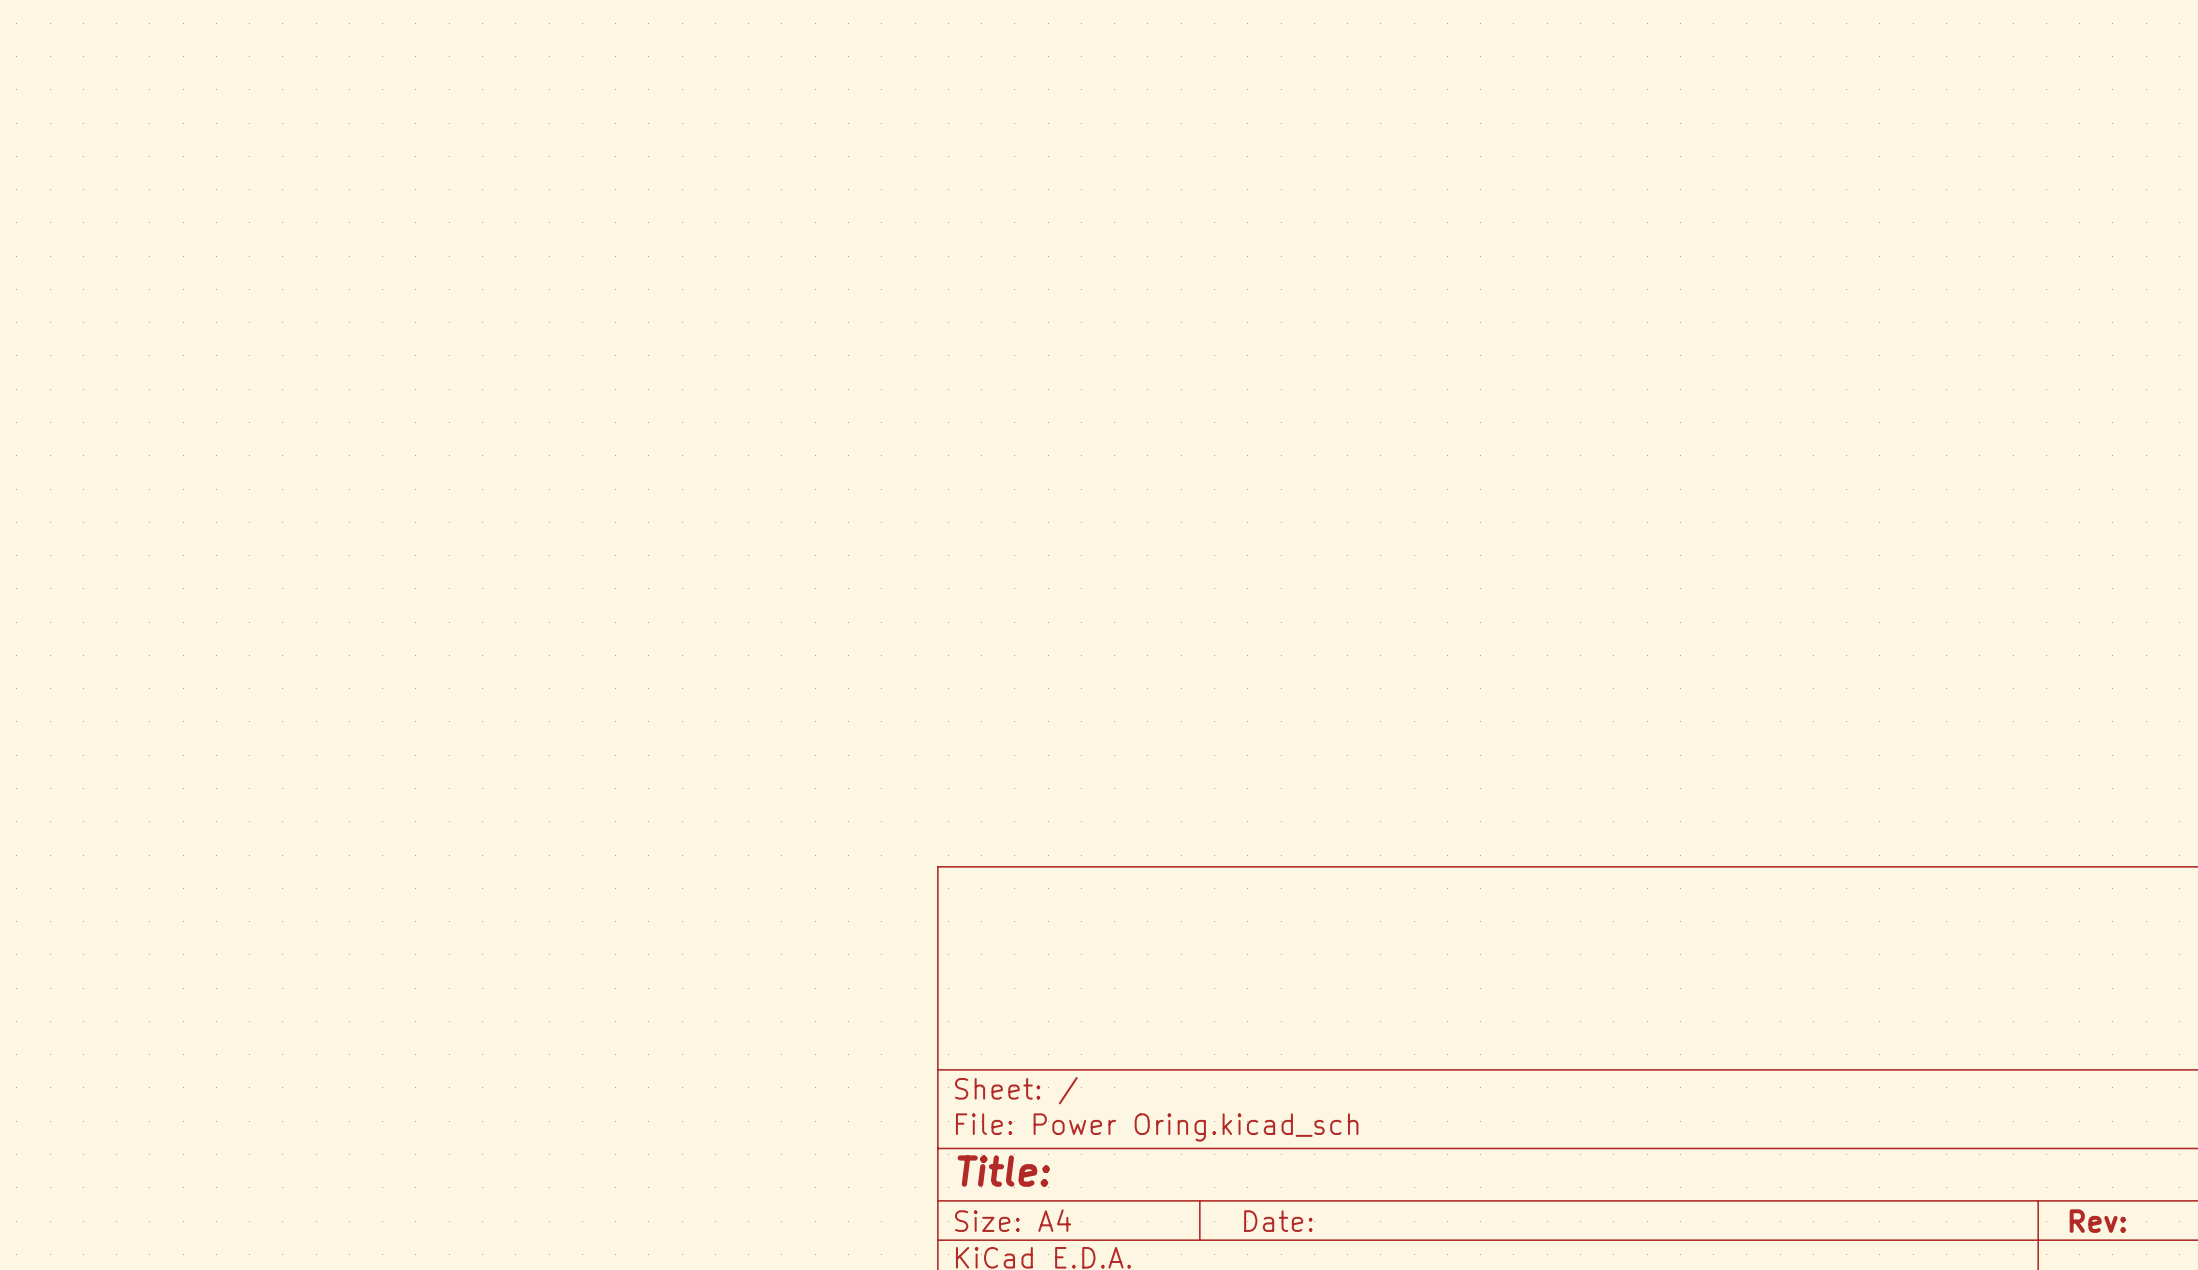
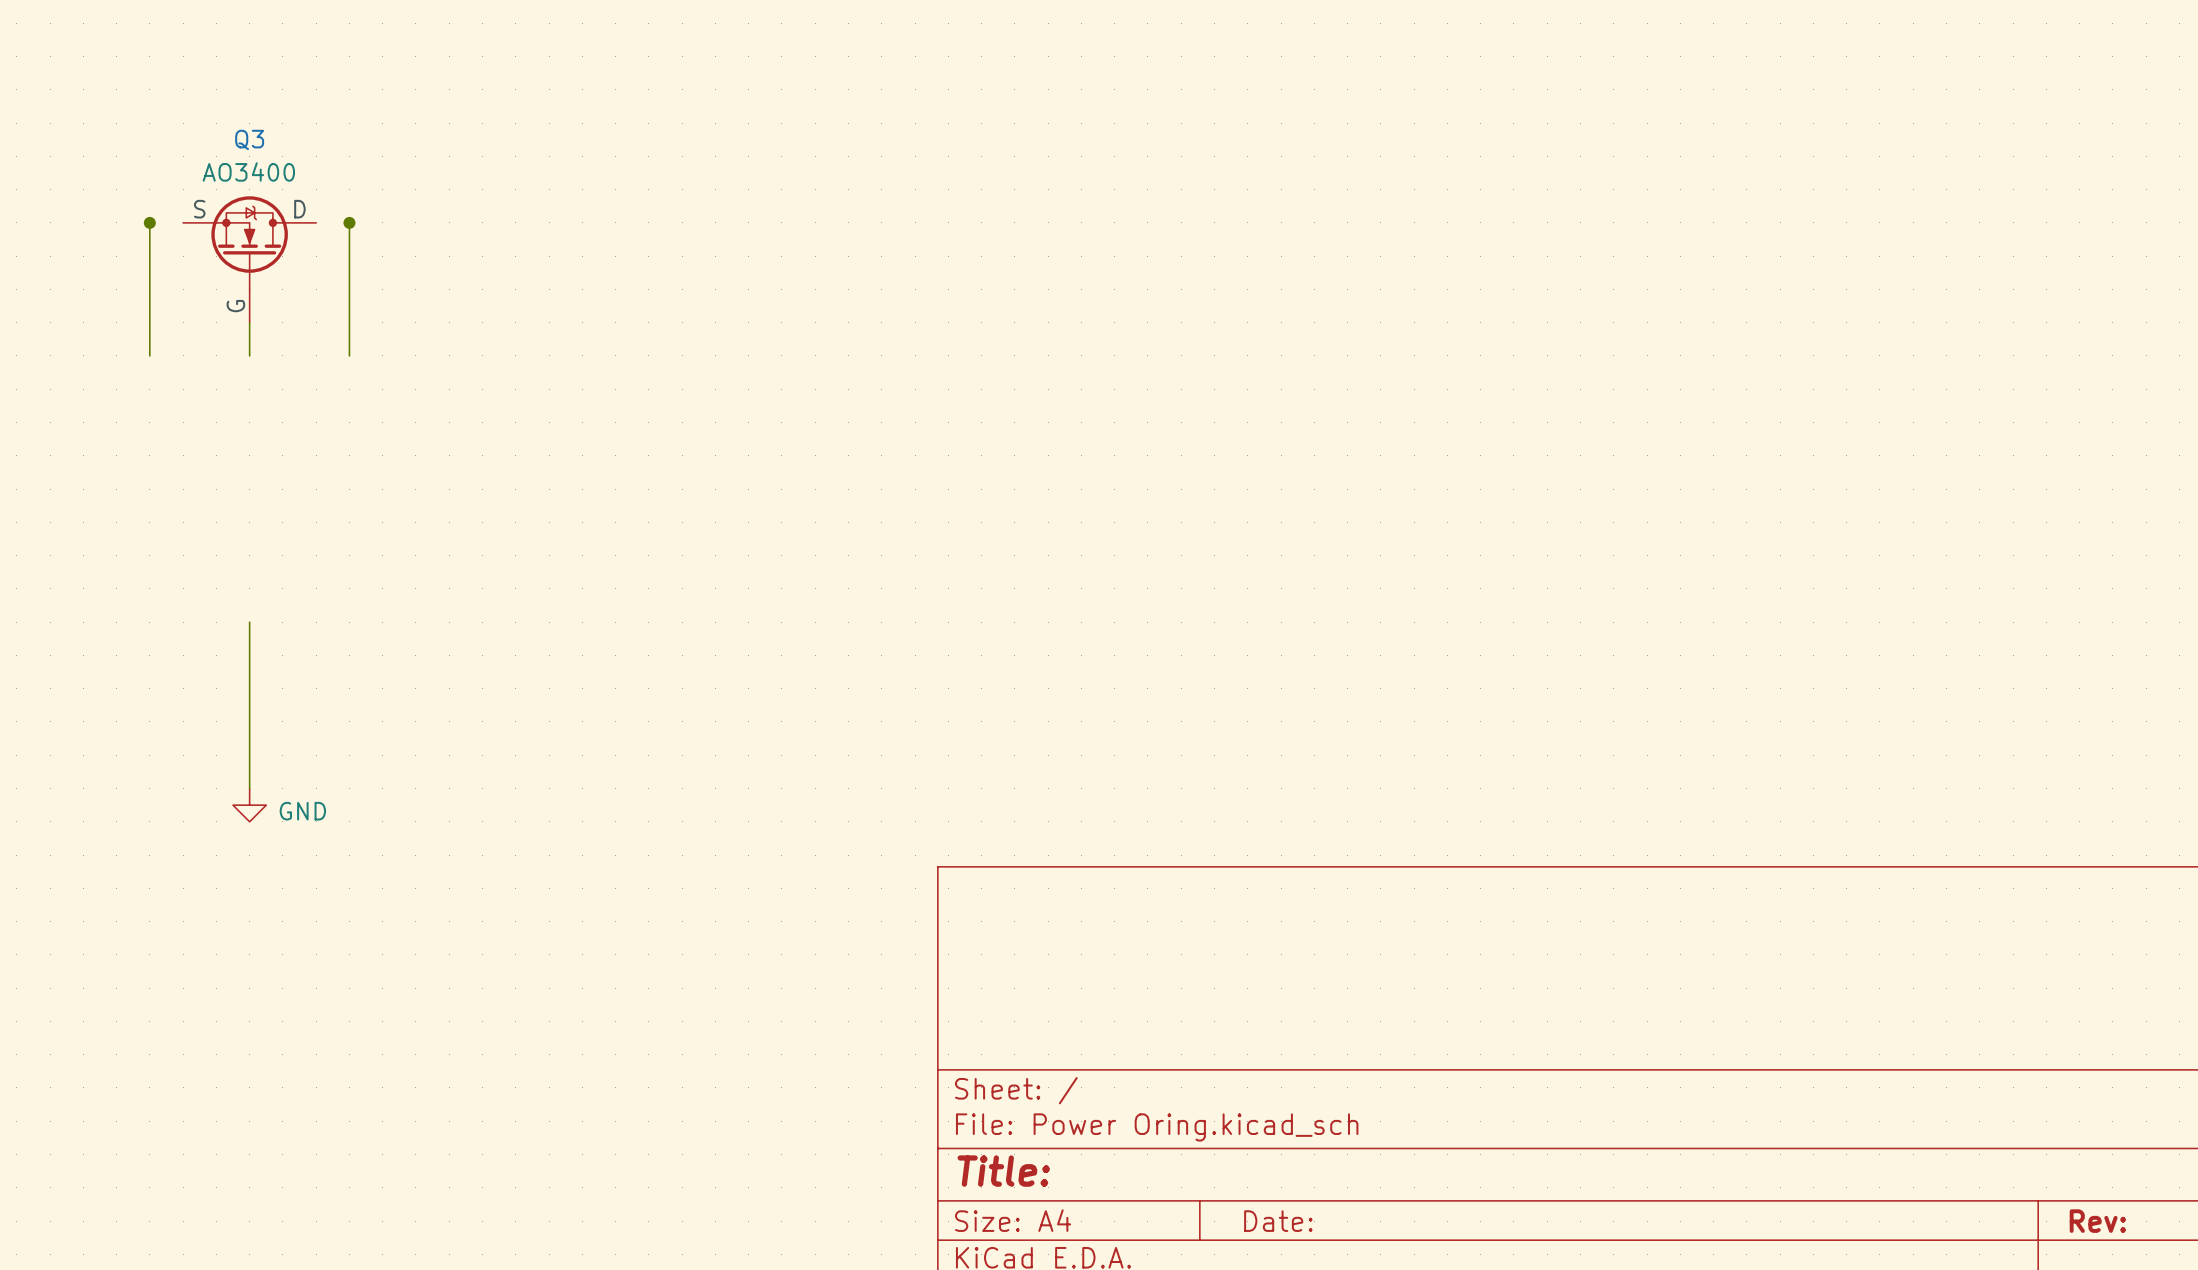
wire: none -> (149, 222) (149, 355)
junction: none -> (149, 222)
wire: none -> (349, 222) (349, 355)
junction: none -> (349, 222)
Q3: none -> AO3400 (249, 259)
wire: none -> (249, 322) (249, 355)
wire: none -> (249, 622) (249, 788)
power symbol: none -> GND (249, 805)

